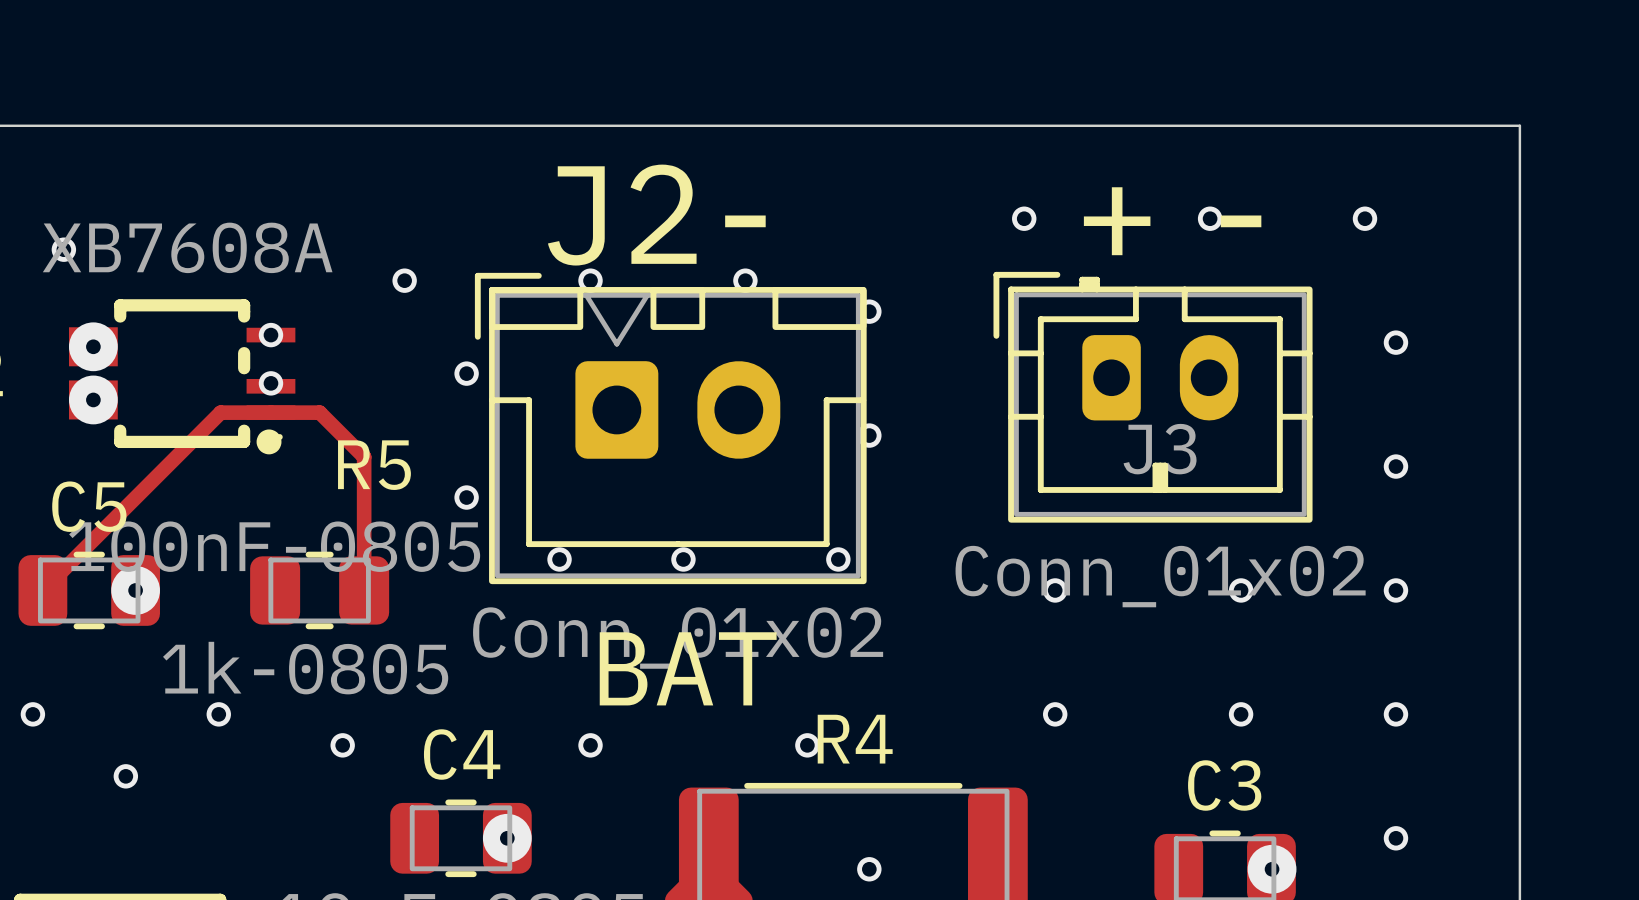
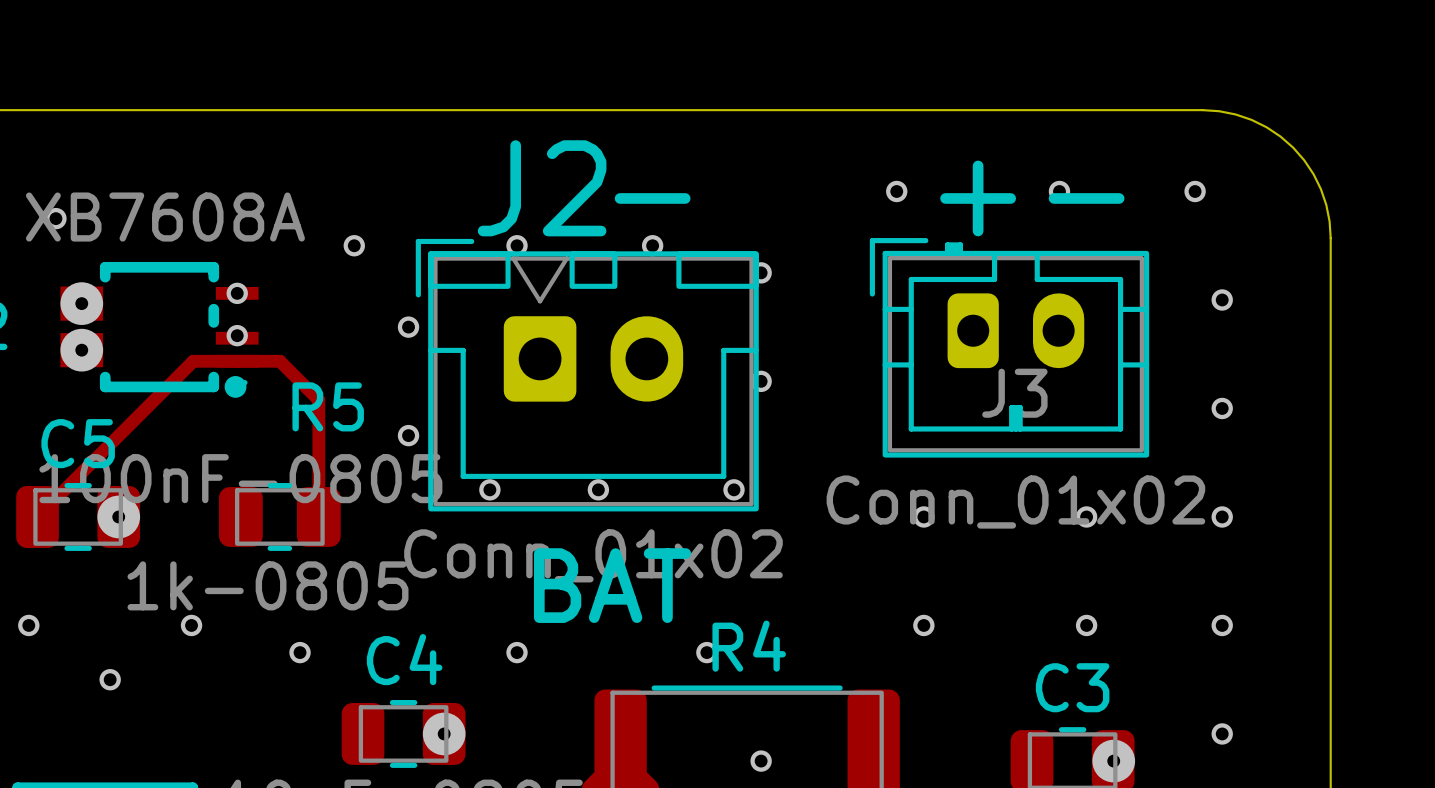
board edge: (1373, 125) (1519, 125) (1519, 272) -> (1202, 110) (1235, 114) (1251, 119) (1280, 136) (1293, 147) (1313, 174) (1320, 189) (1329, 221) (1330, 238)

